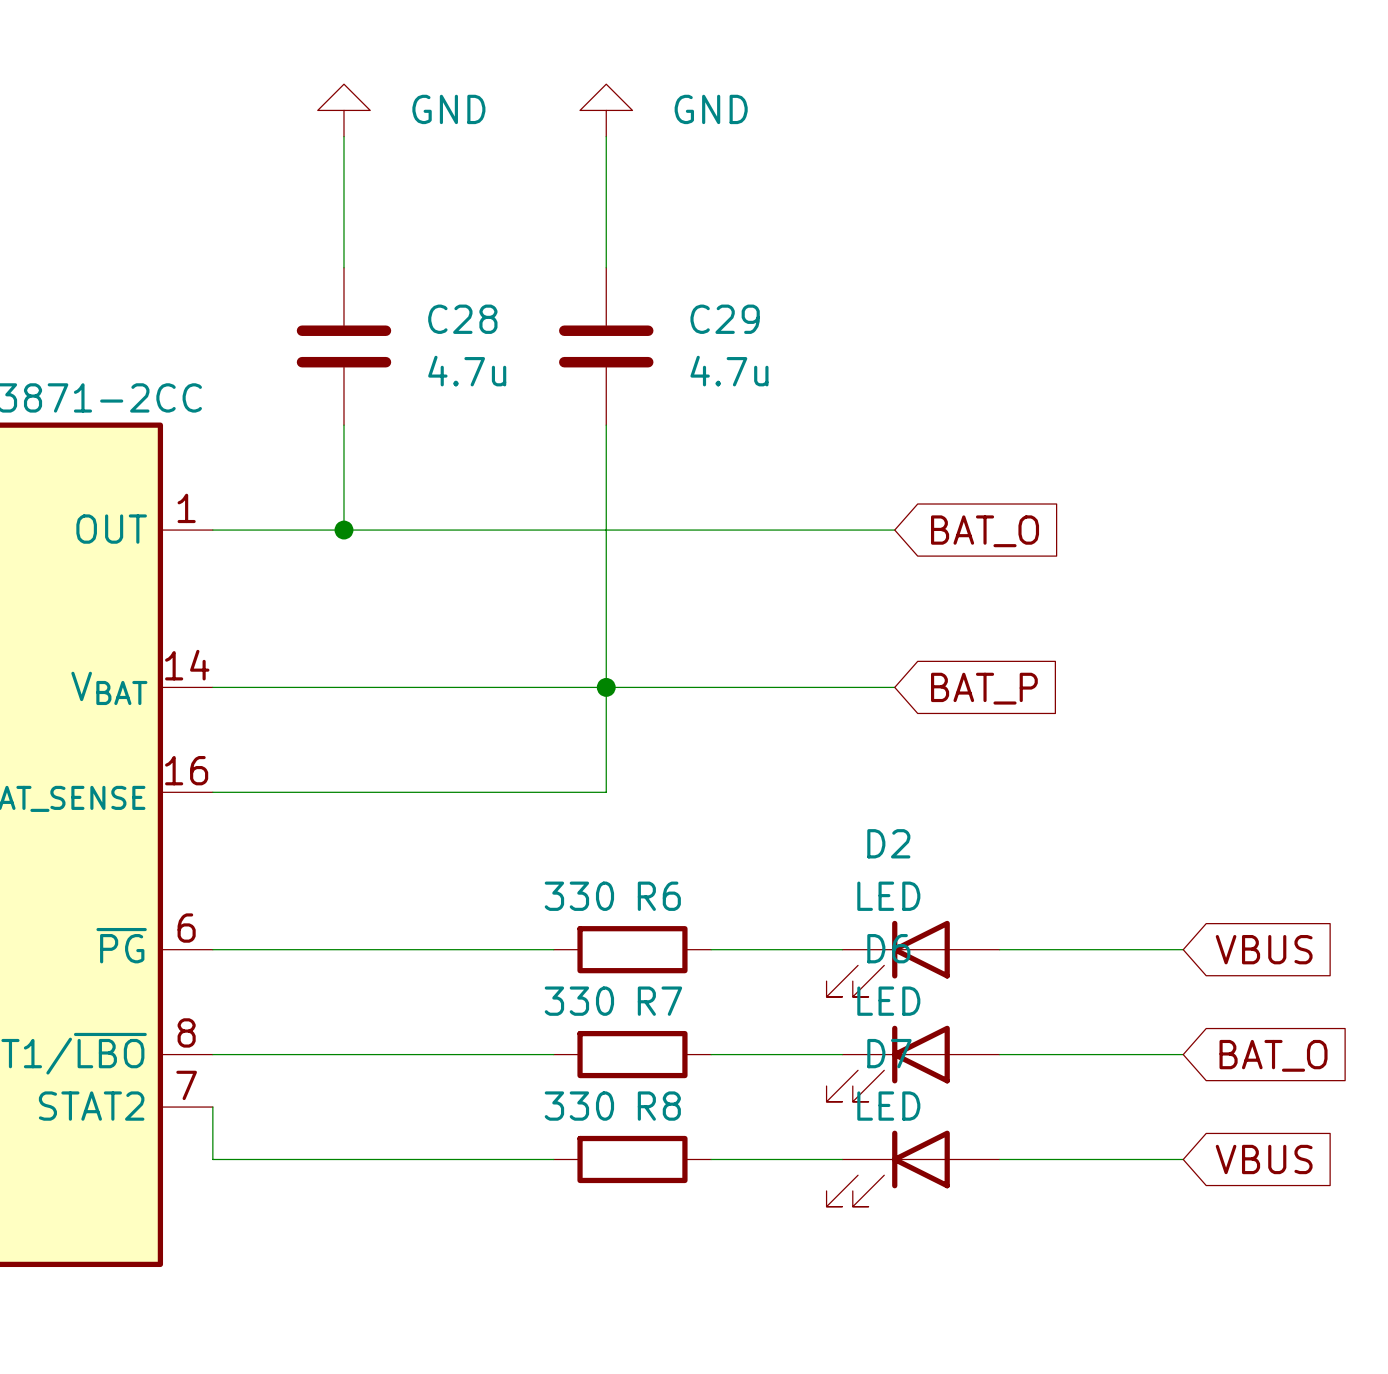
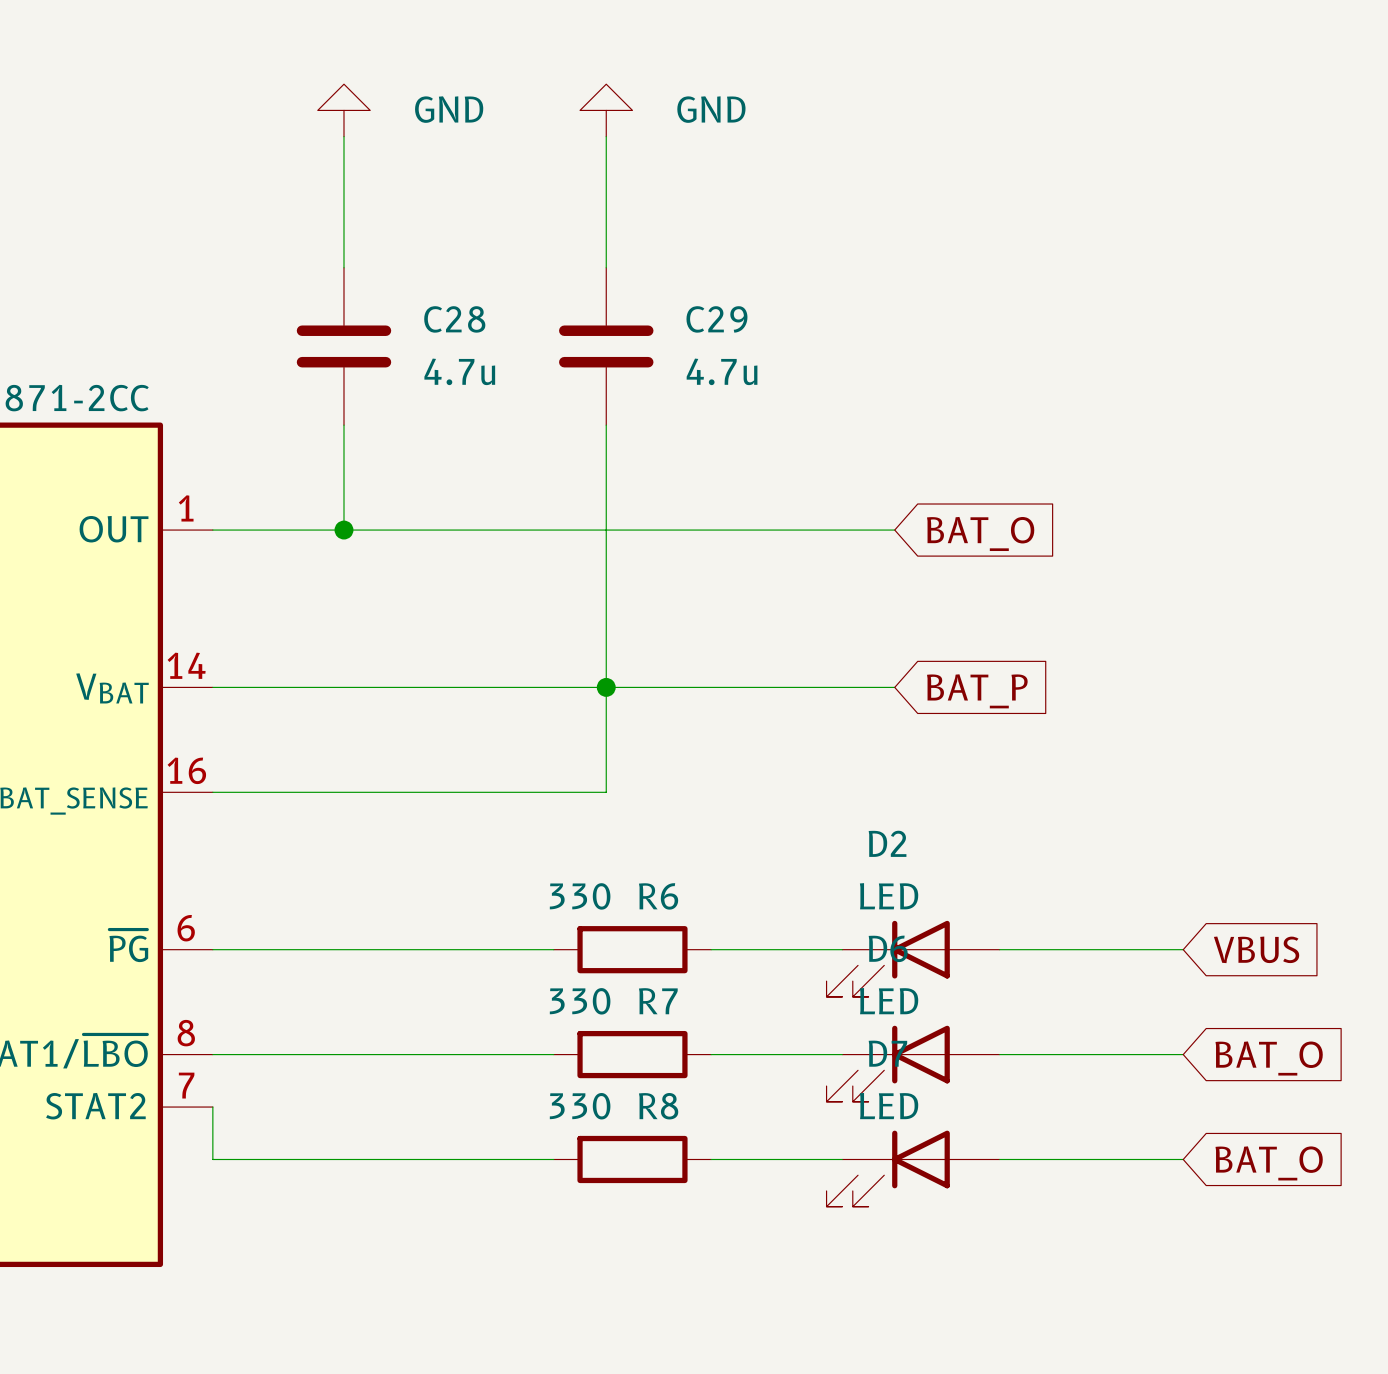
global label: VBUS (1264, 1159) -> BAT_O (1269, 1163)

